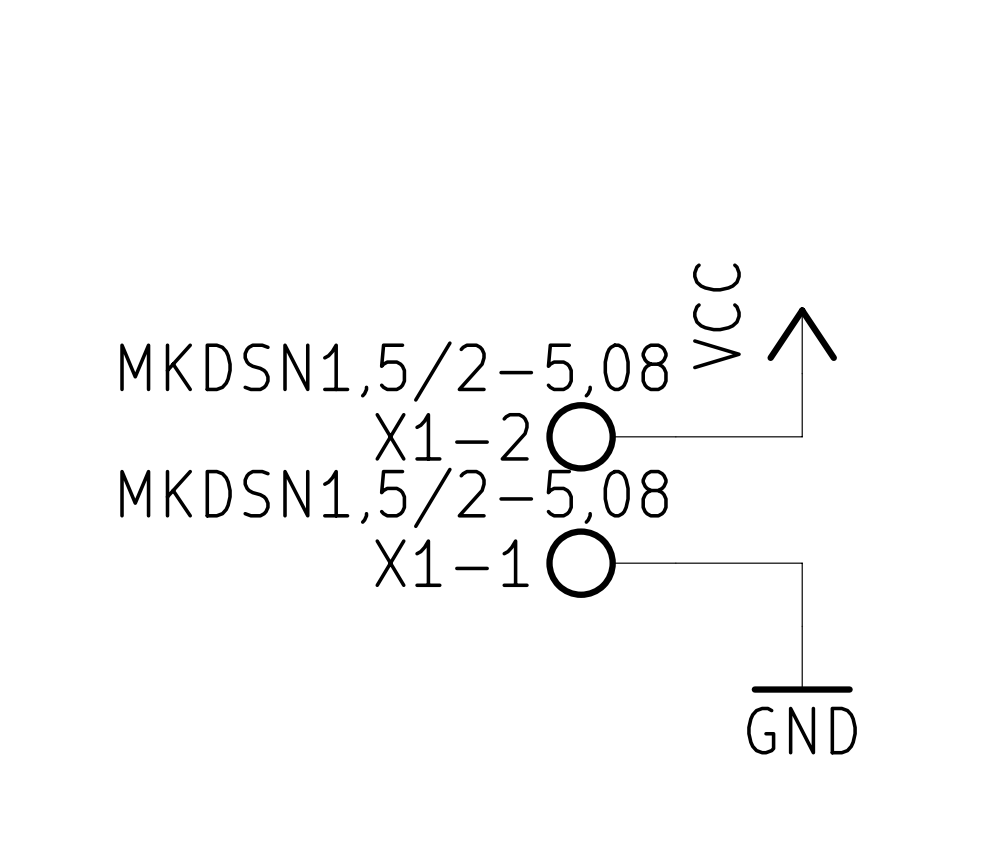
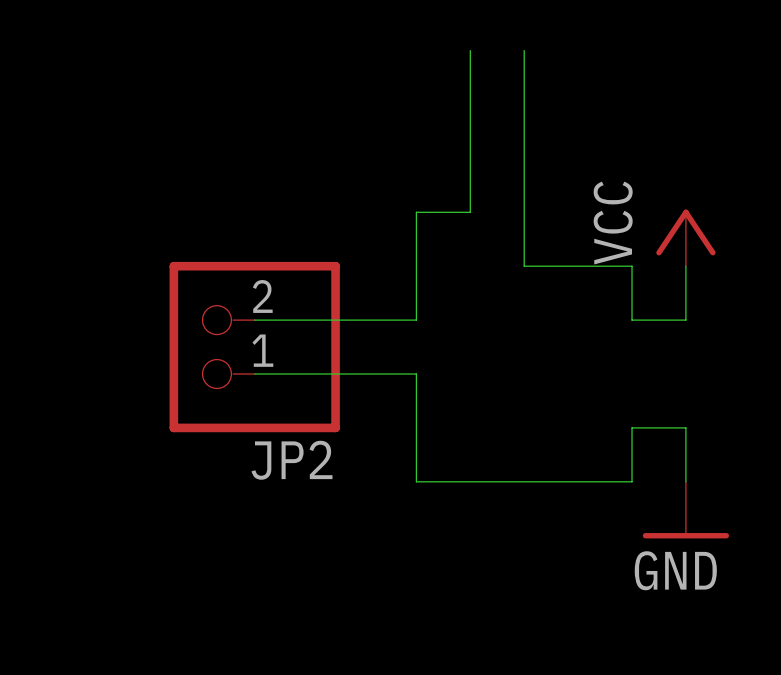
wire: none -> (470, 50) (470, 212) (416, 212) (416, 320) (254, 320)
X1-2: MKDSN1,5/2-5,08 (611, 436) -> none
wire: (675, 436) (739, 436) -> (524, 50) (524, 266) (632, 266) (632, 320)
JP2: none -> (254, 347)
X1-1: MKDSN1,5/2-5,08 (611, 563) -> none
wire: (675, 563) (739, 563) -> (254, 374) (416, 374) (416, 481) (632, 481) (632, 427)

